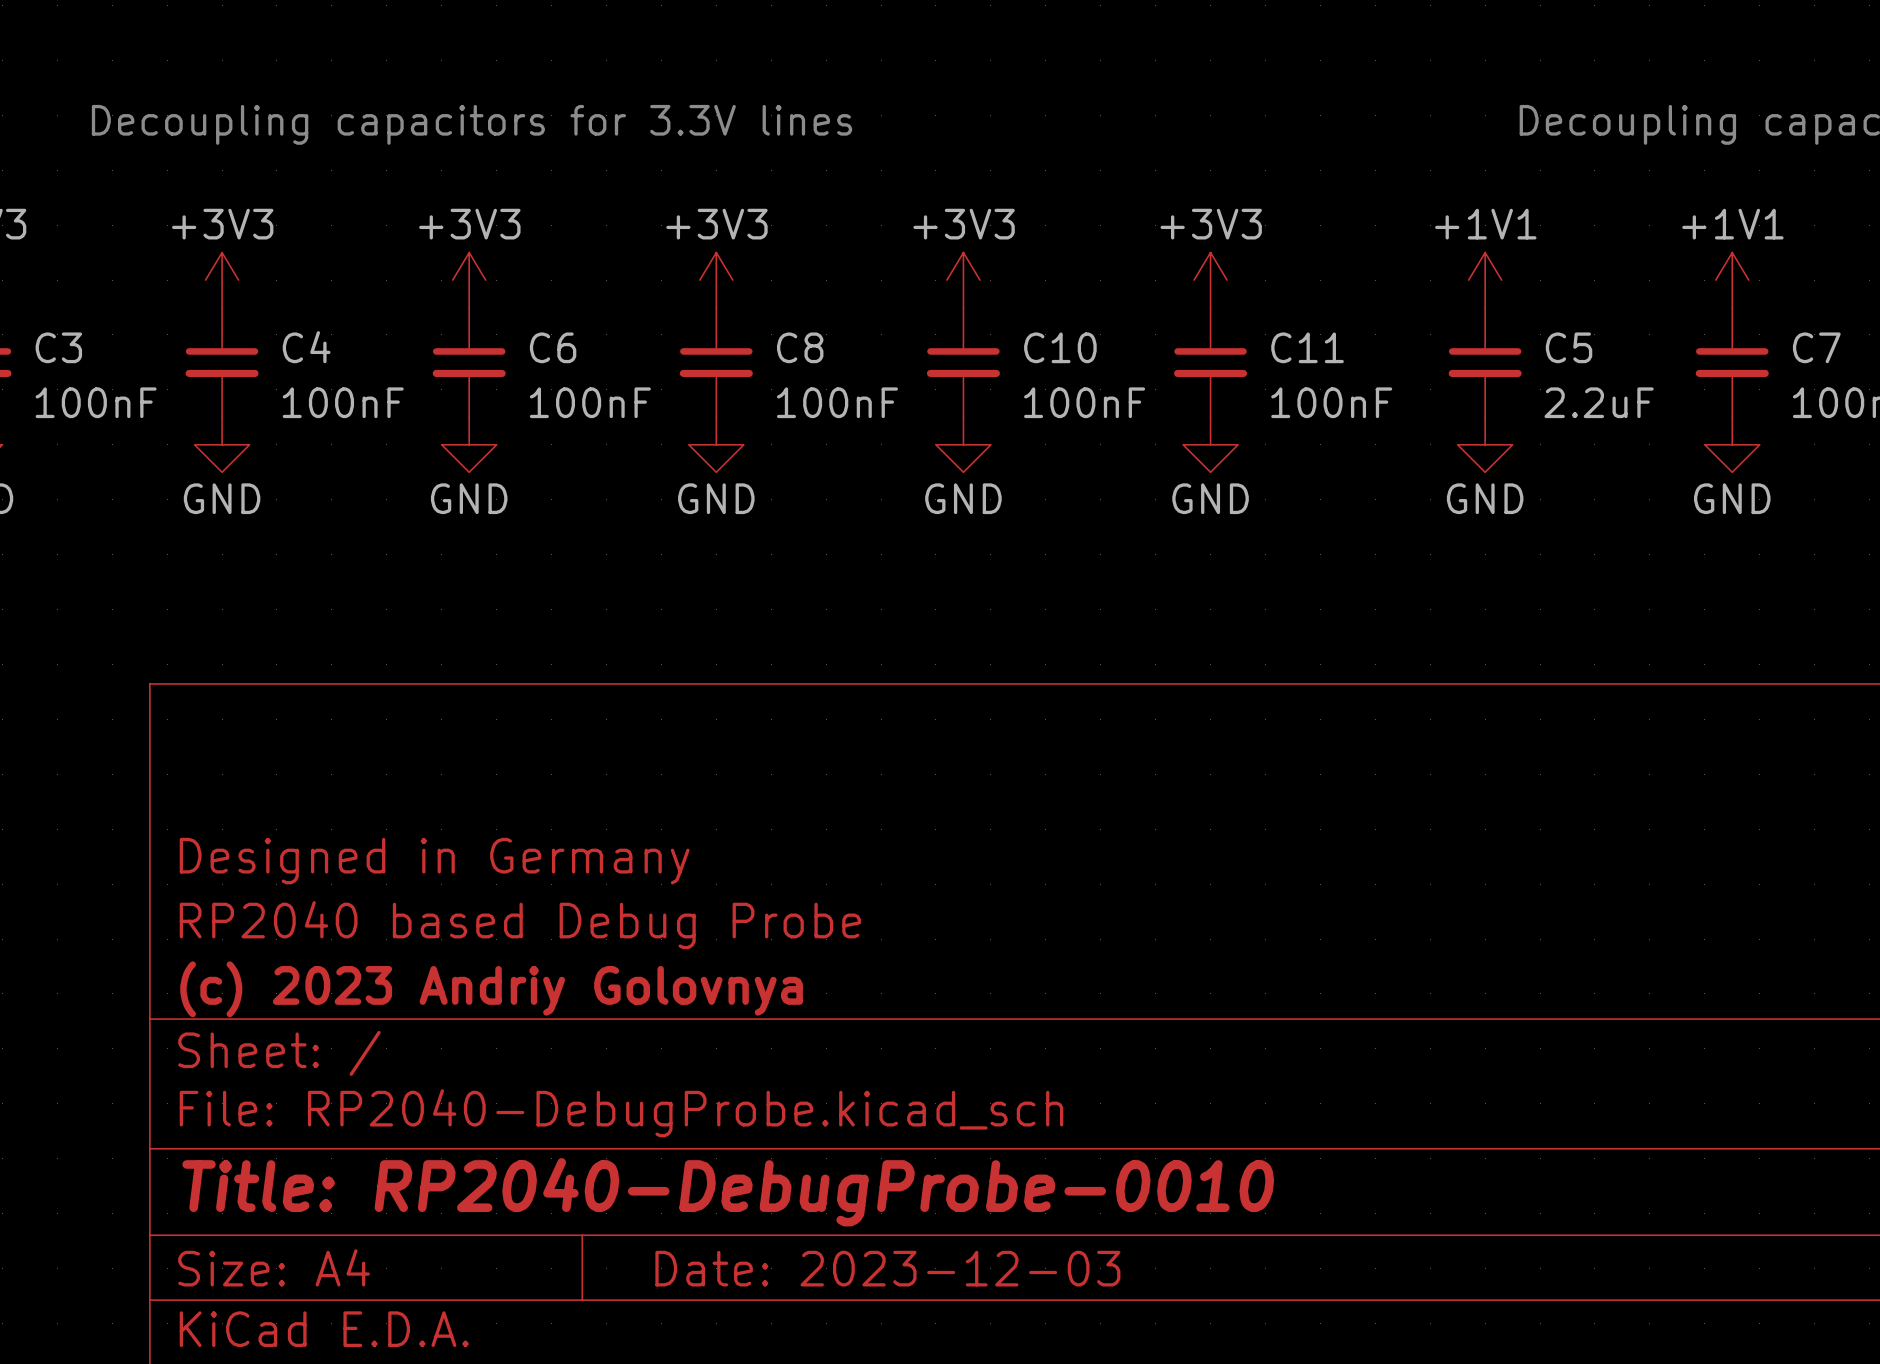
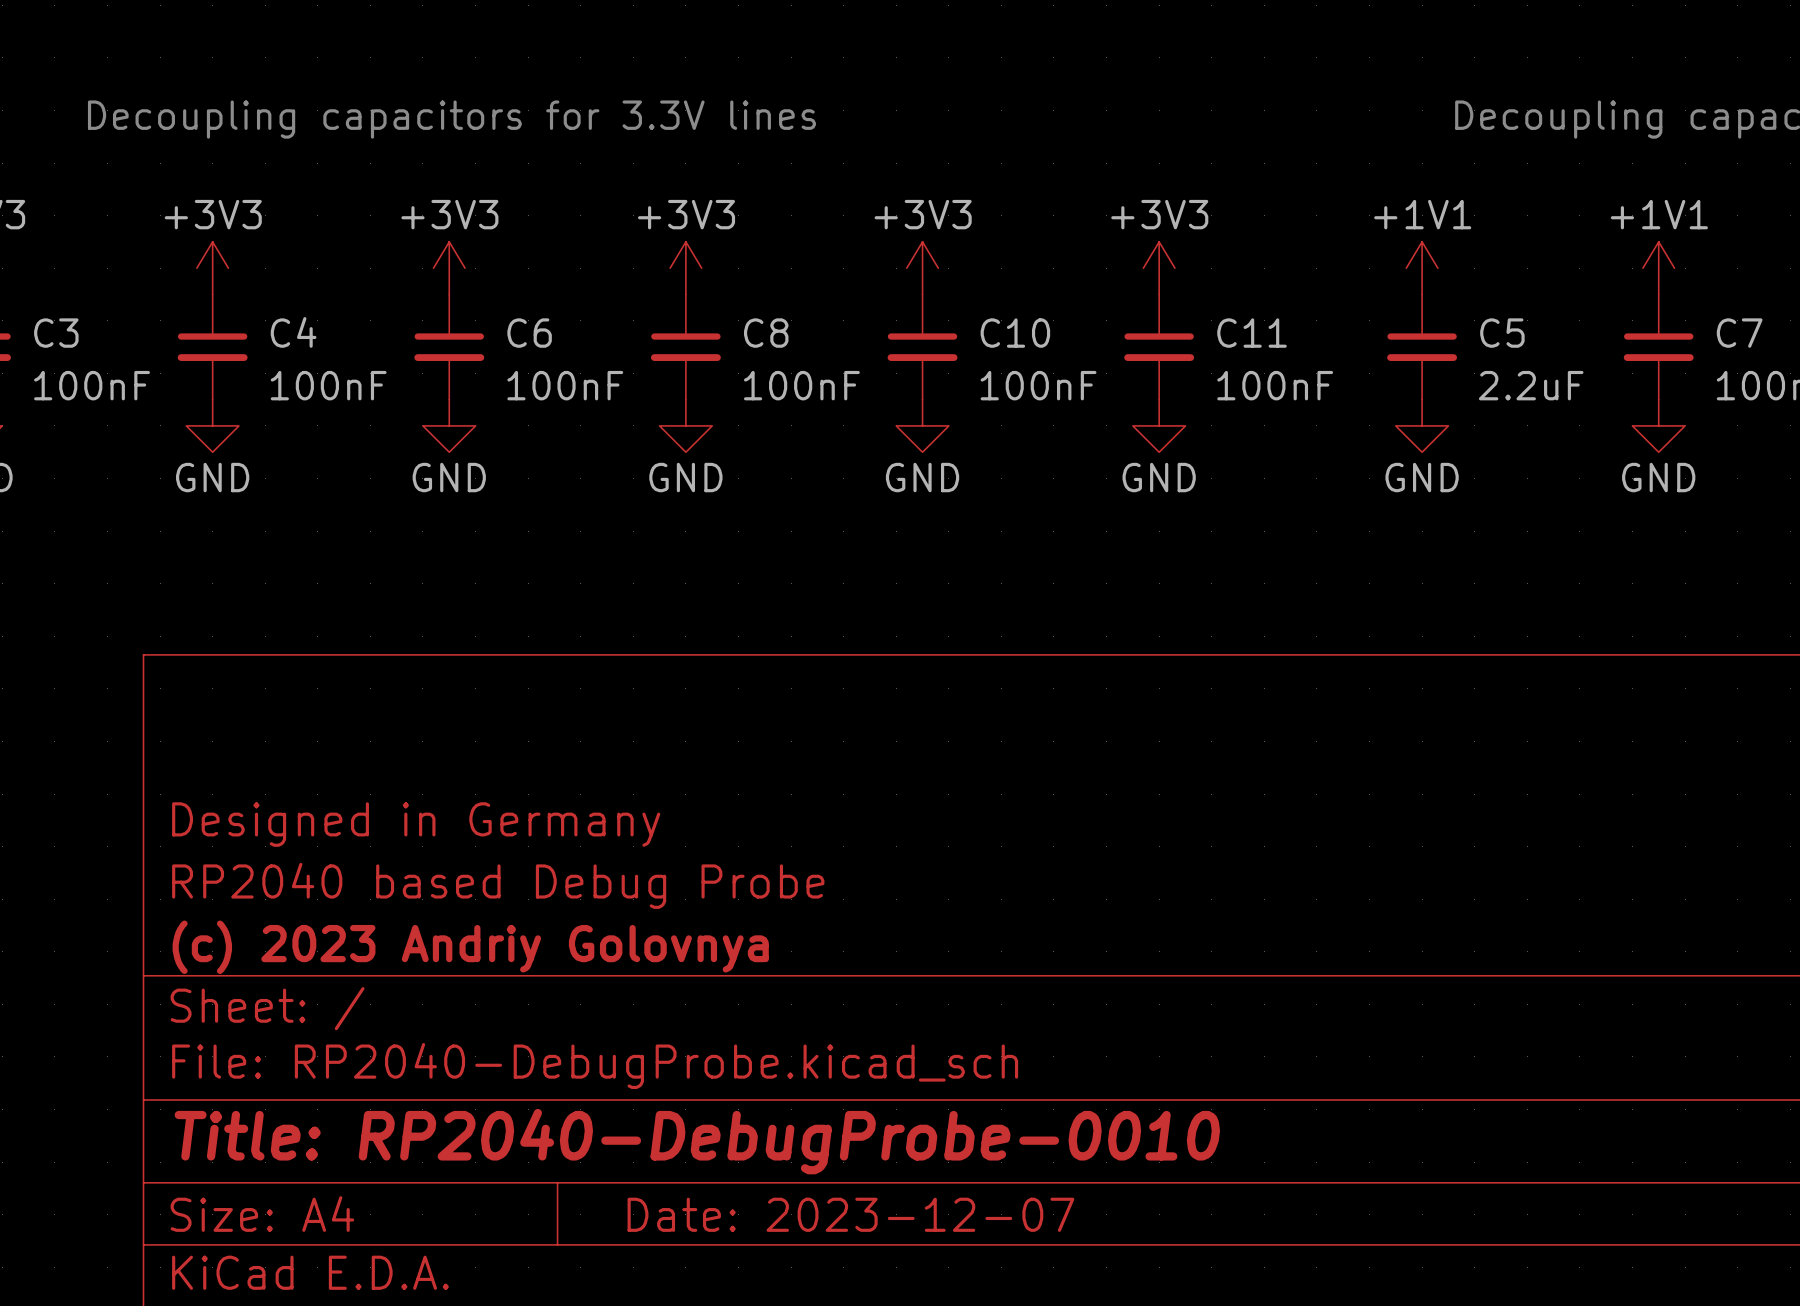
title block: Date: 2023-12-03 (887, 1268) -> Date: 2023-12-07 (850, 1214)

